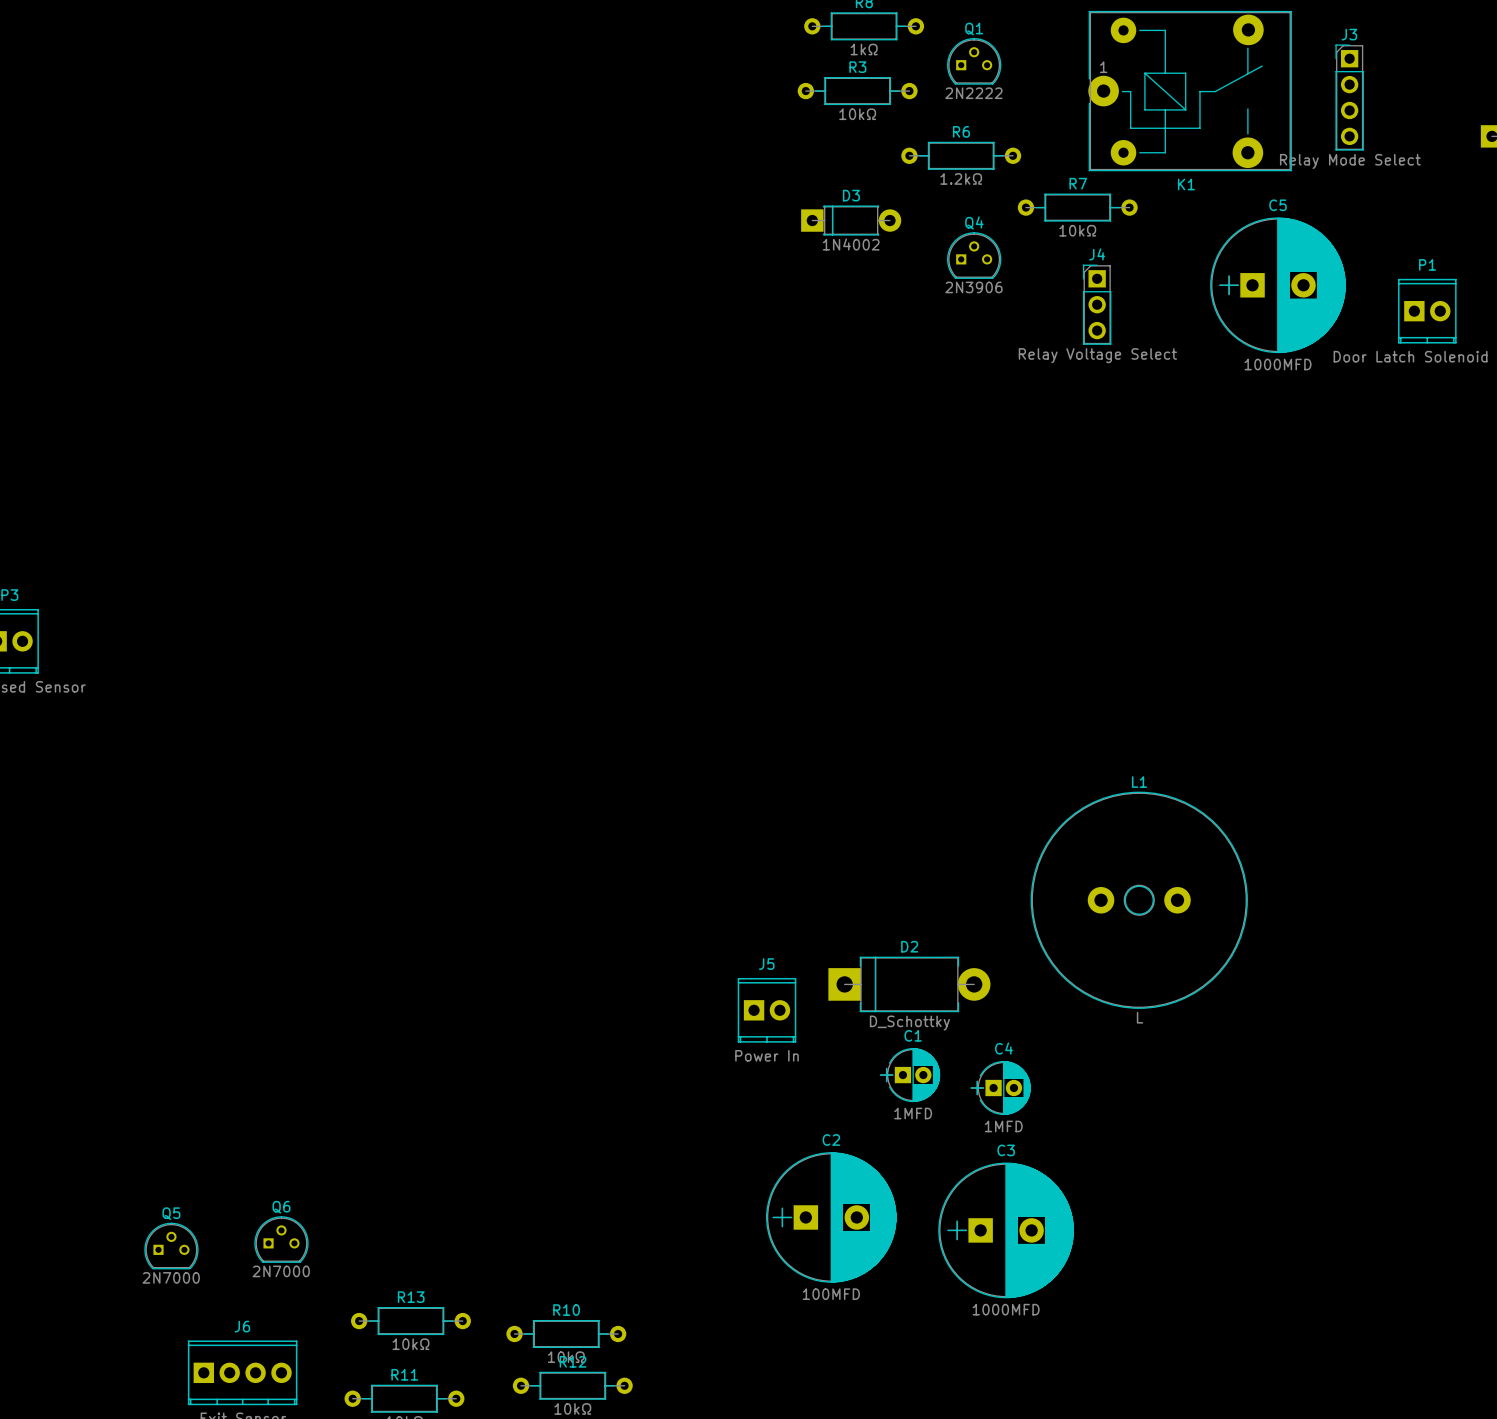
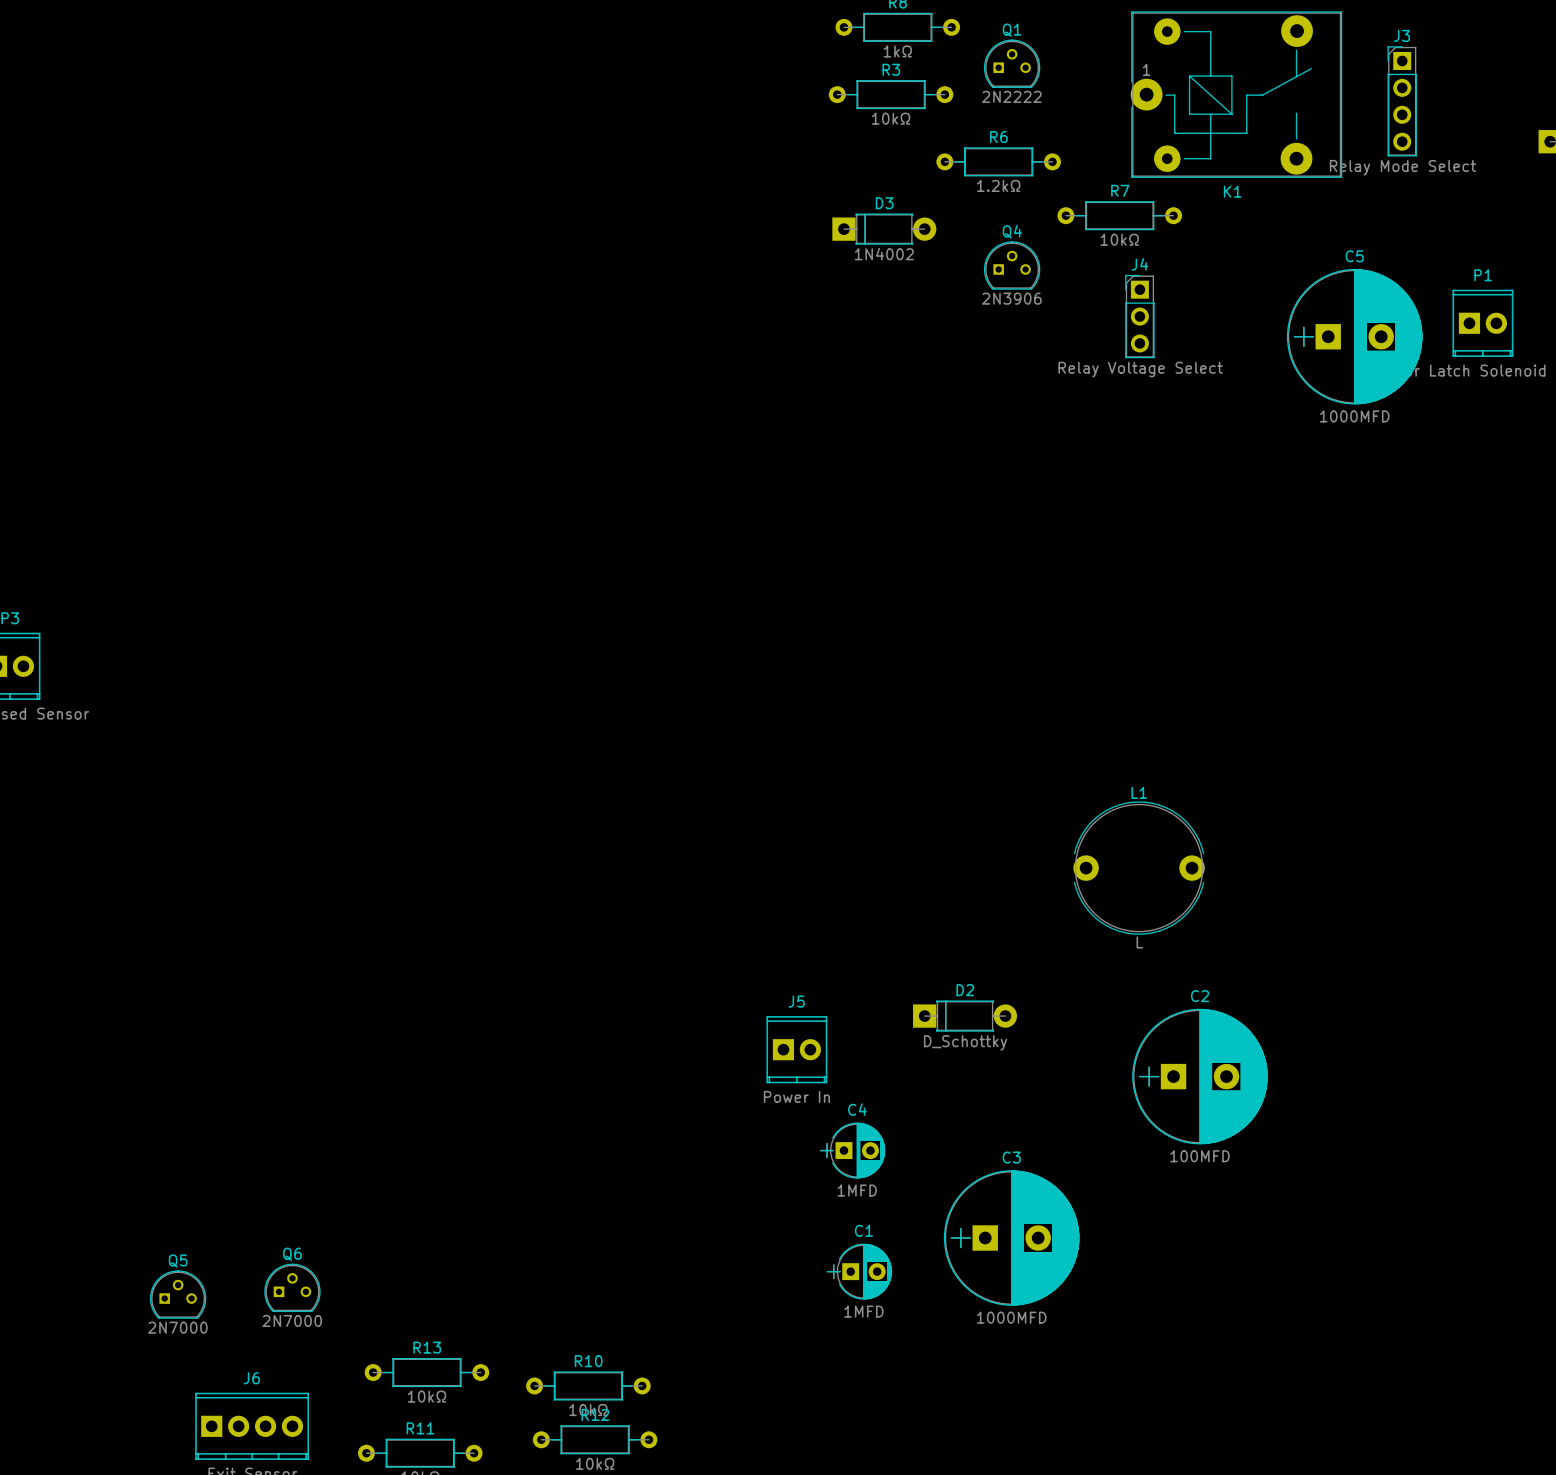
C5 footprint: [1210, 217, 1346, 354] -> [1286, 268, 1423, 405]
L1 name position: L1 (1139, 782) -> L1 (1139, 792)
L1 footprint: [1030, 791, 1248, 1009] -> [1073, 801, 1205, 935]
D2 footprint: [828, 956, 991, 1013] -> [913, 1000, 1018, 1032]
L1 value position: L (1140, 1017) -> L (1139, 942)
C1 footprint: [879, 1048, 941, 1103] -> [826, 1243, 893, 1300]
C4 footprint: [970, 1060, 1031, 1116] -> [820, 1122, 886, 1179]
C3 footprint: [938, 1162, 1074, 1299] -> [943, 1170, 1080, 1306]
C2 position: (831, 1217) -> (1200, 1076)

